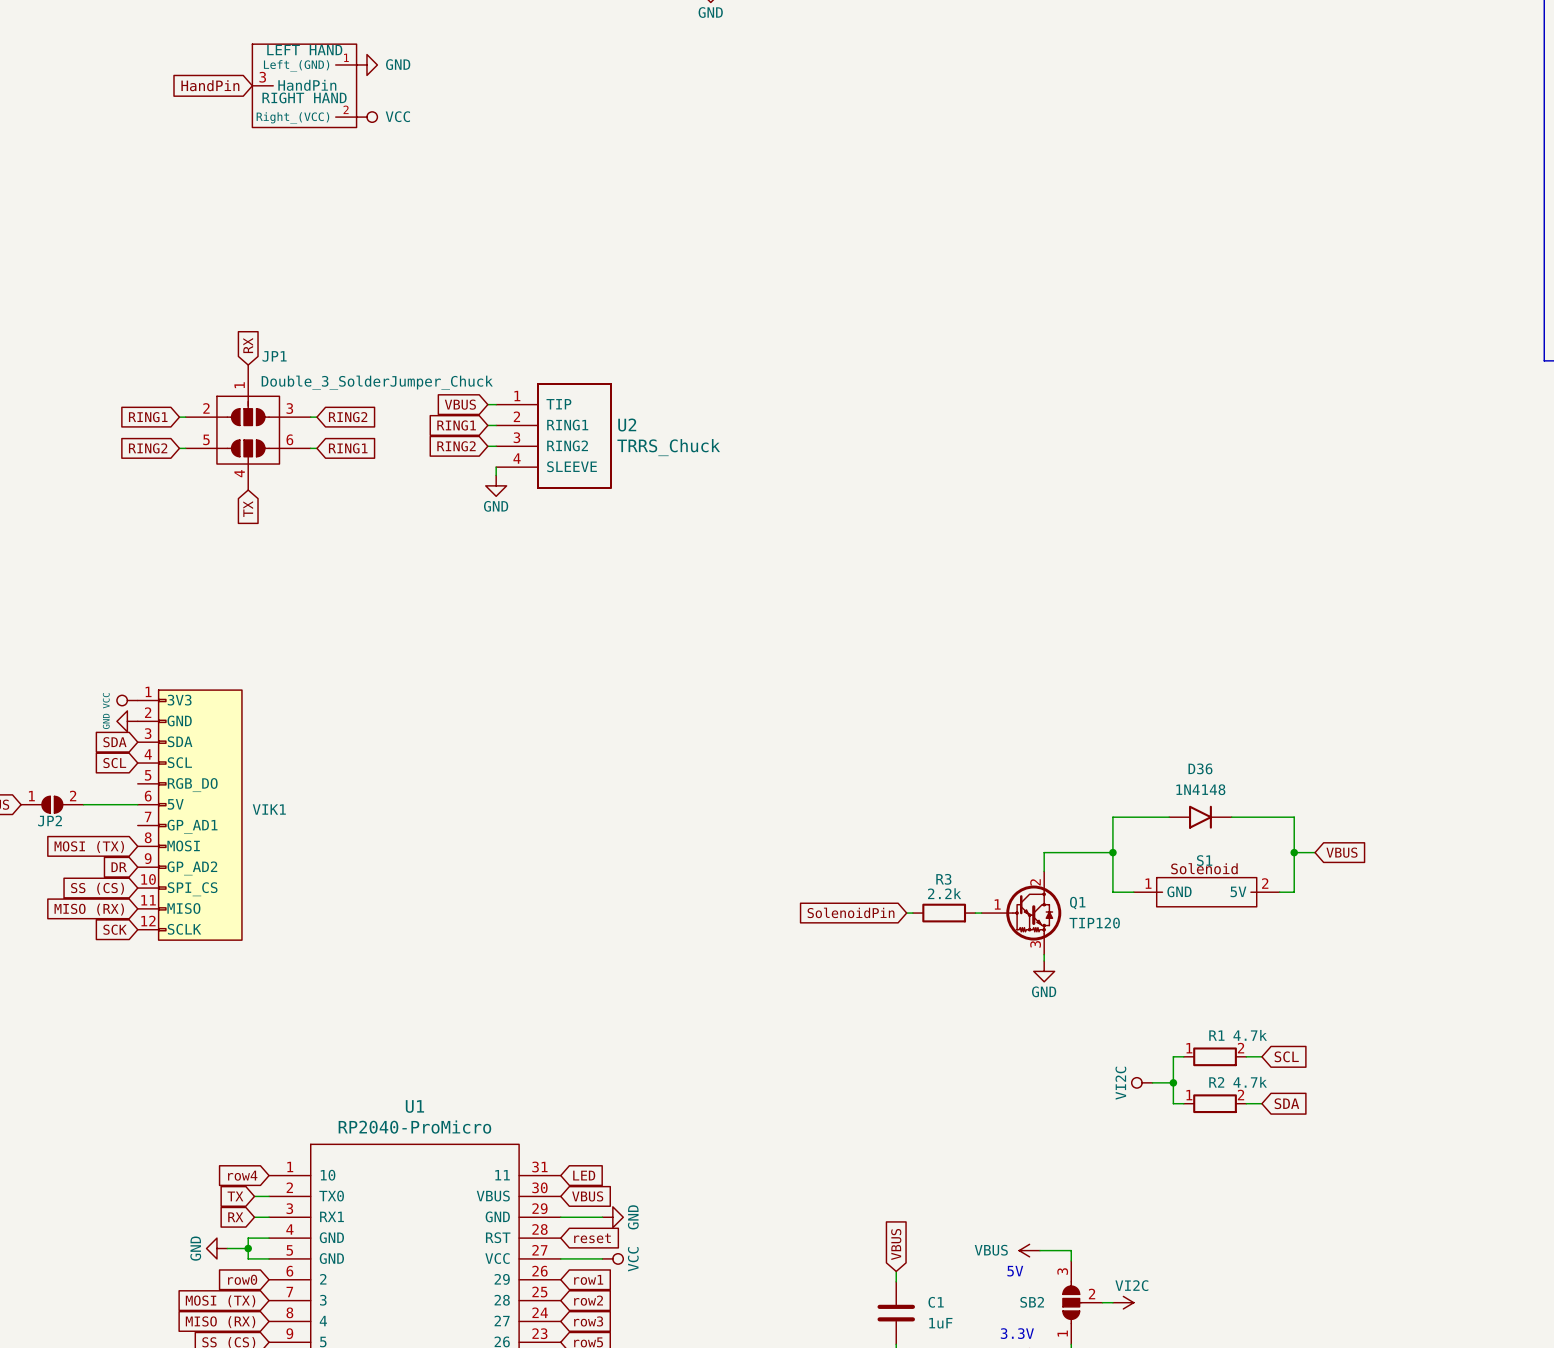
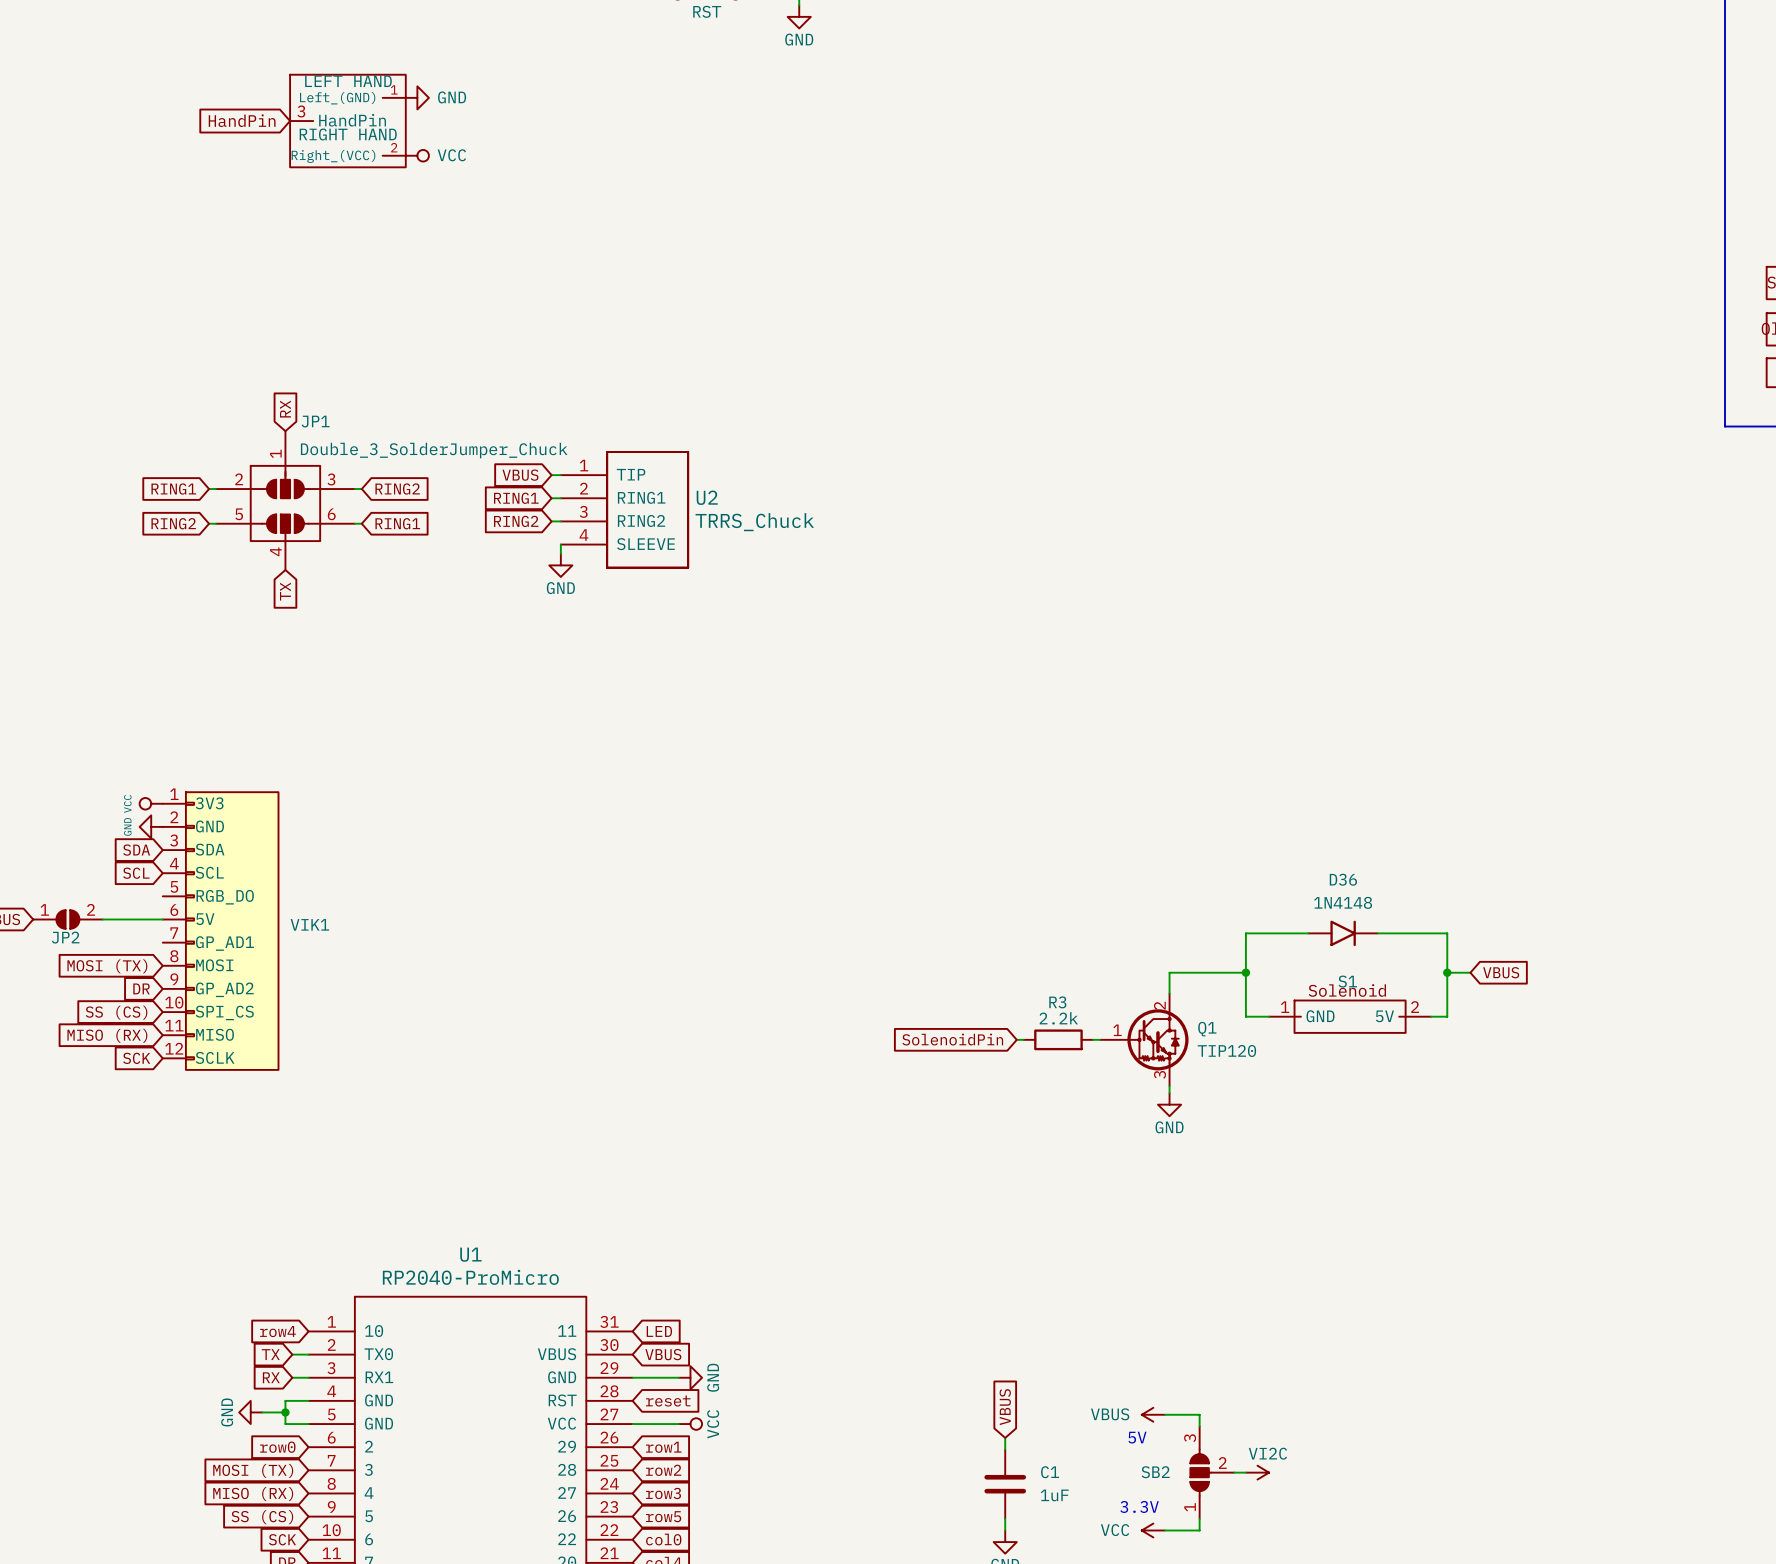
wire: (1183, 1056) (1173, 1056) (1173, 1103) (1183, 1103) -> none
R1: 4.7k (1215, 1056) -> none
wire: (1246, 1056) (1261, 1056) -> none
global label: SCL (1286, 1056) -> none
power symbol: VI2C (1142, 1082) -> none
wire: (1152, 1082) (1173, 1082) -> none
junction: (1173, 1082) -> none
R2: 4.7k (1215, 1103) -> none
wire: (1246, 1103) (1261, 1103) -> none
global label: SDA (1286, 1103) -> none

